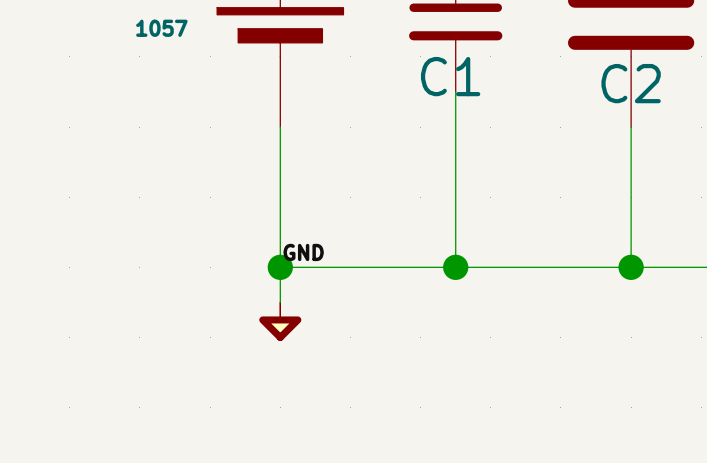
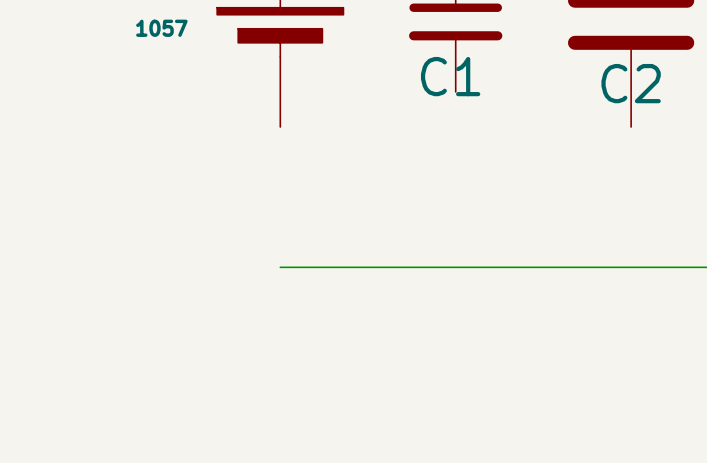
wire: (455, 91) (455, 267) -> none
wire: (280, 127) (280, 302) -> none
wire: (631, 127) (631, 267) -> none
label: GND (303, 252) -> none
junction: (280, 267) -> none
junction: (455, 267) -> none
junction: (631, 267) -> none
power symbol: (280, 321) -> none

